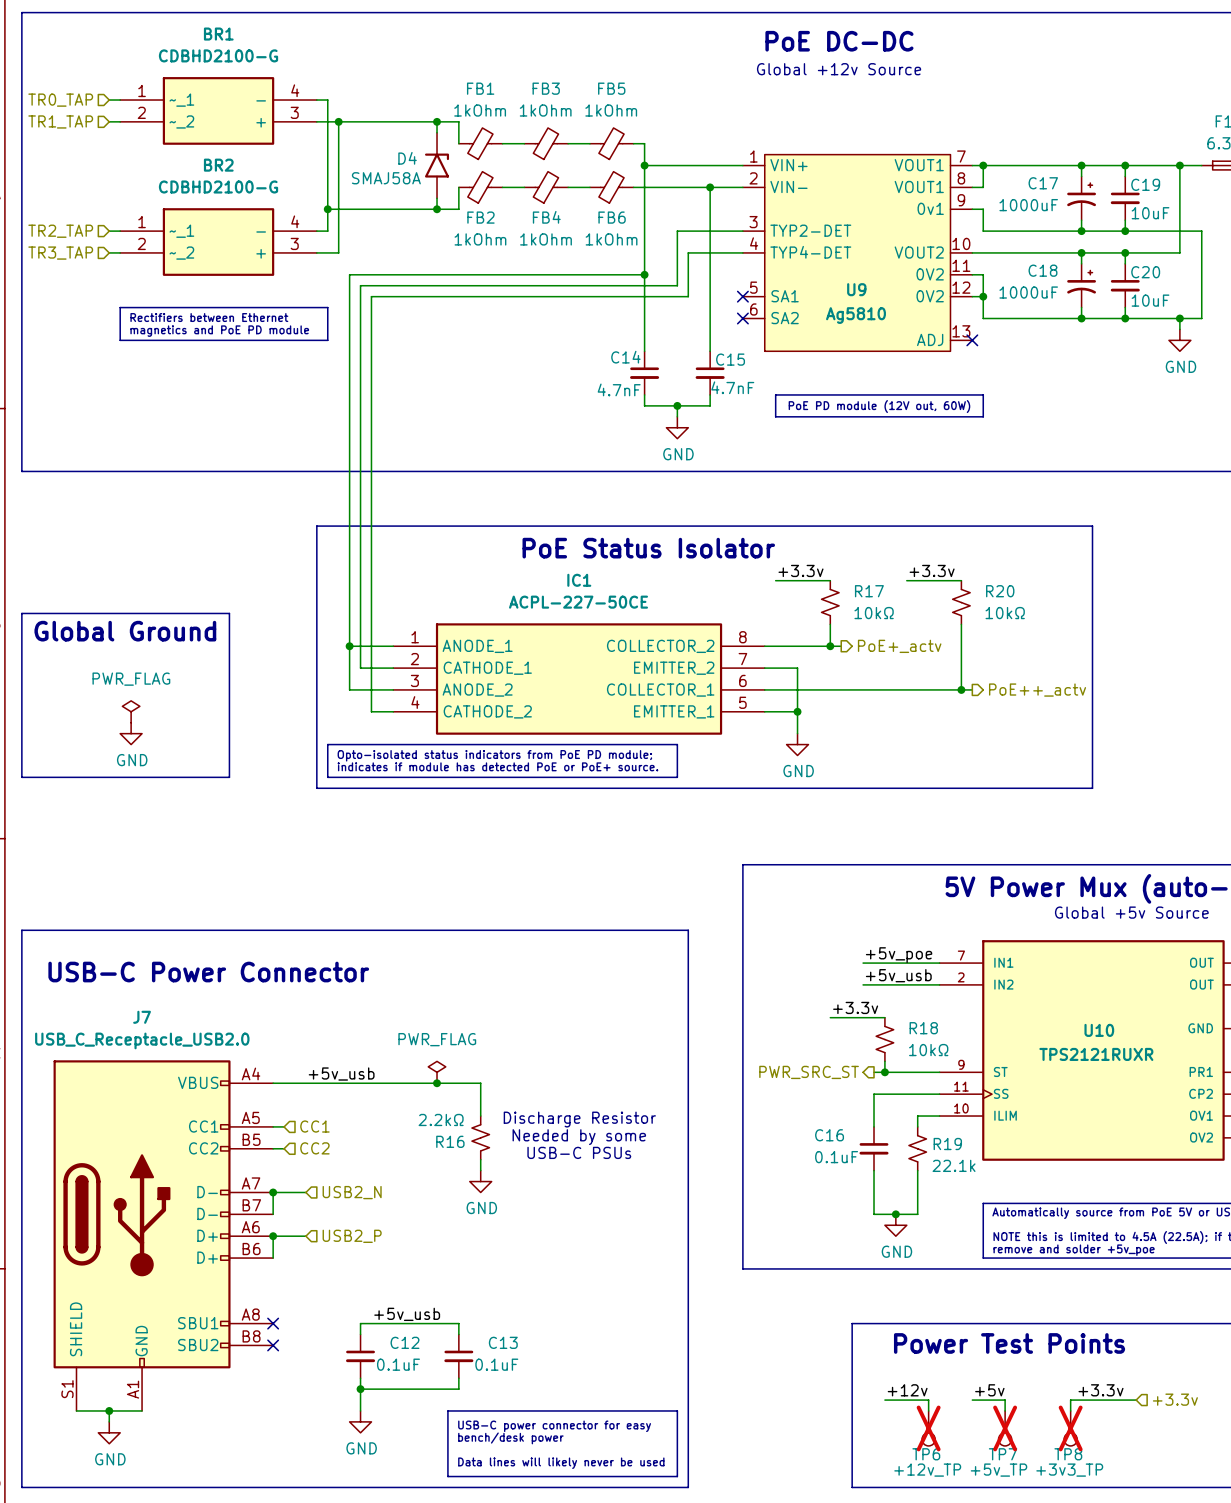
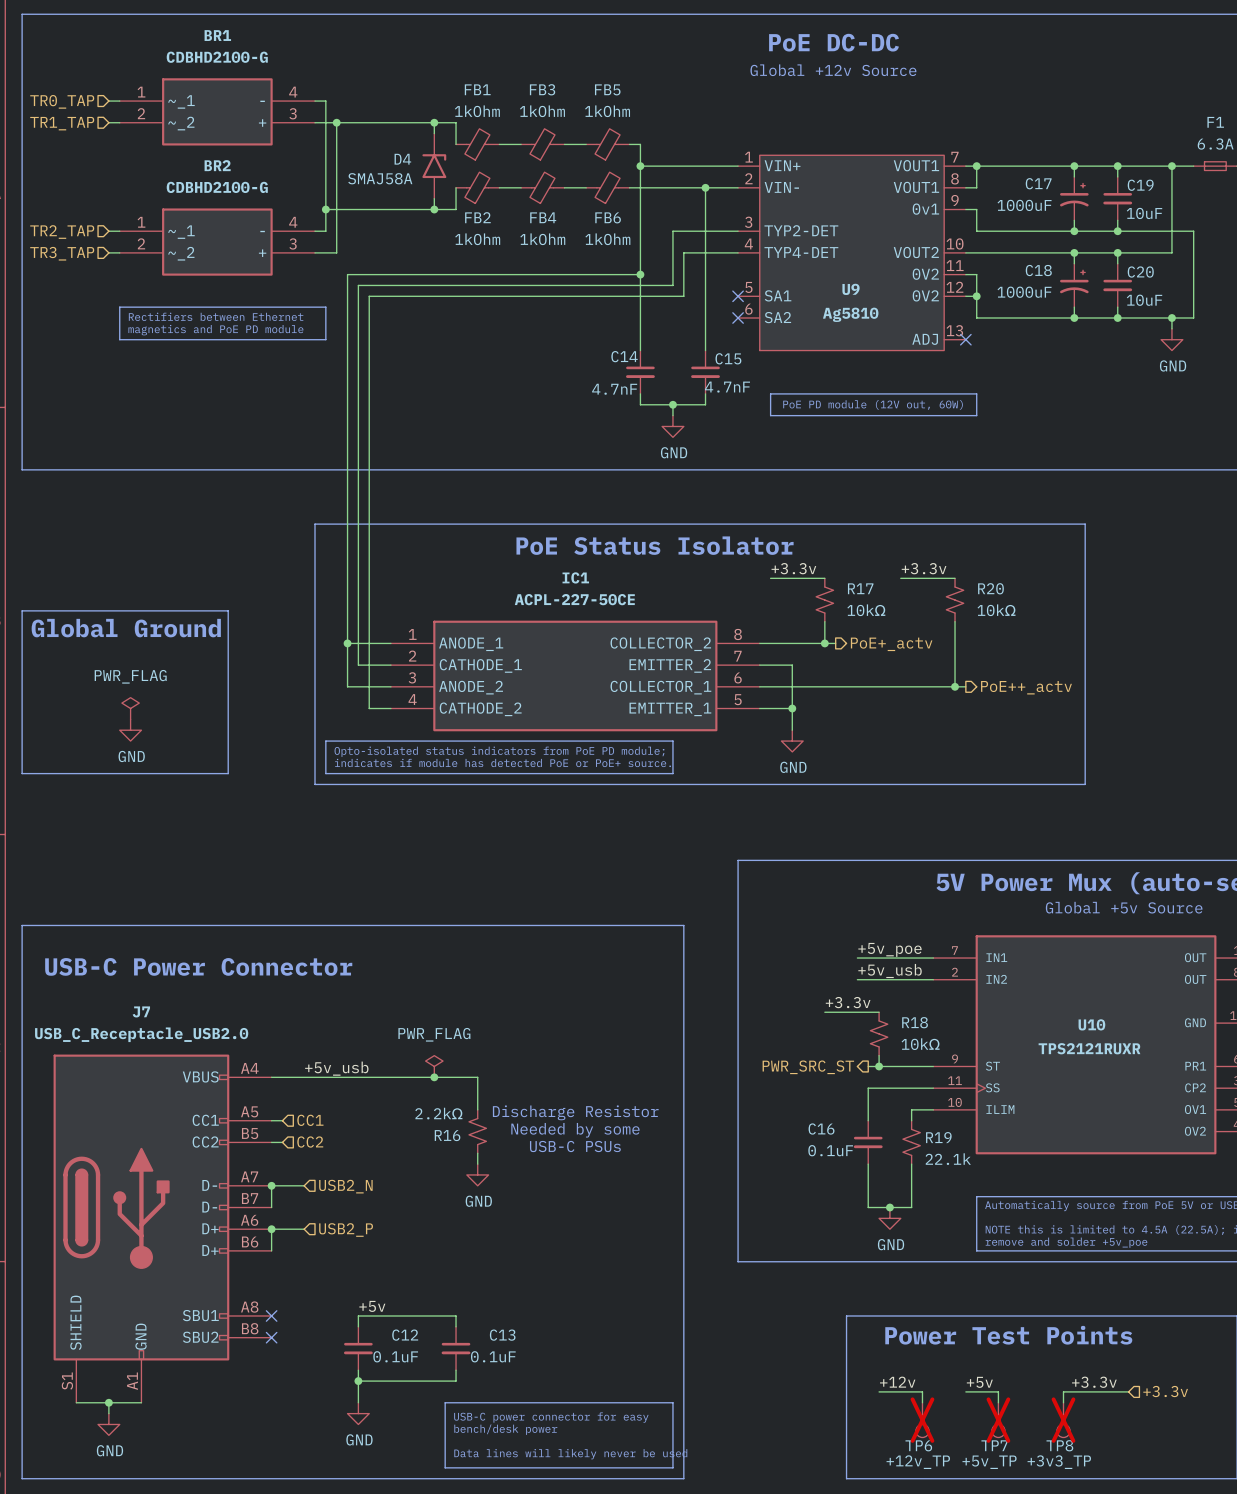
label: none -> +5v (372, 1306)
label: +5v_usb (407, 1314) -> none

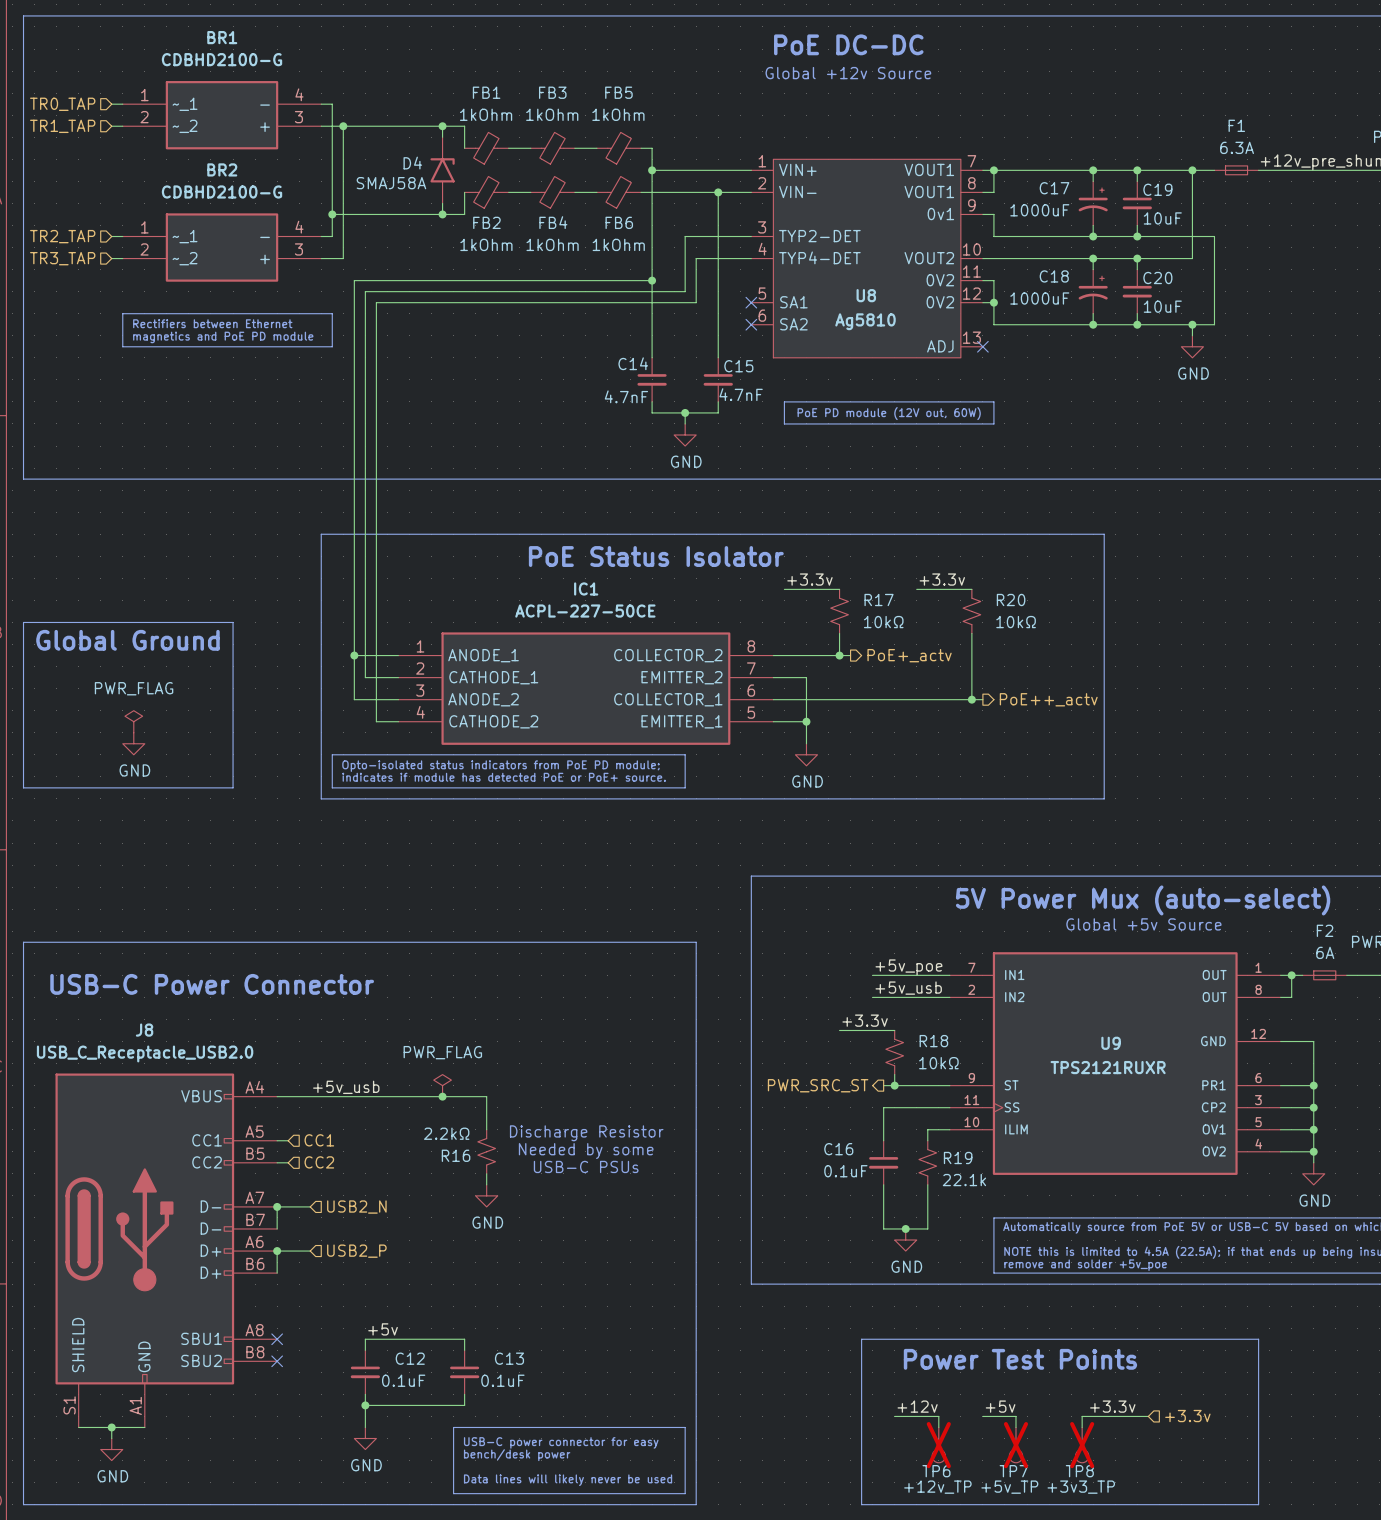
U9 name: U9 (851, 289) -> U8 (866, 295)
J7 name: J7 (141, 1011) -> J8 (144, 1030)
U10 name: U10 (1091, 1024) -> U9 (1111, 1043)

